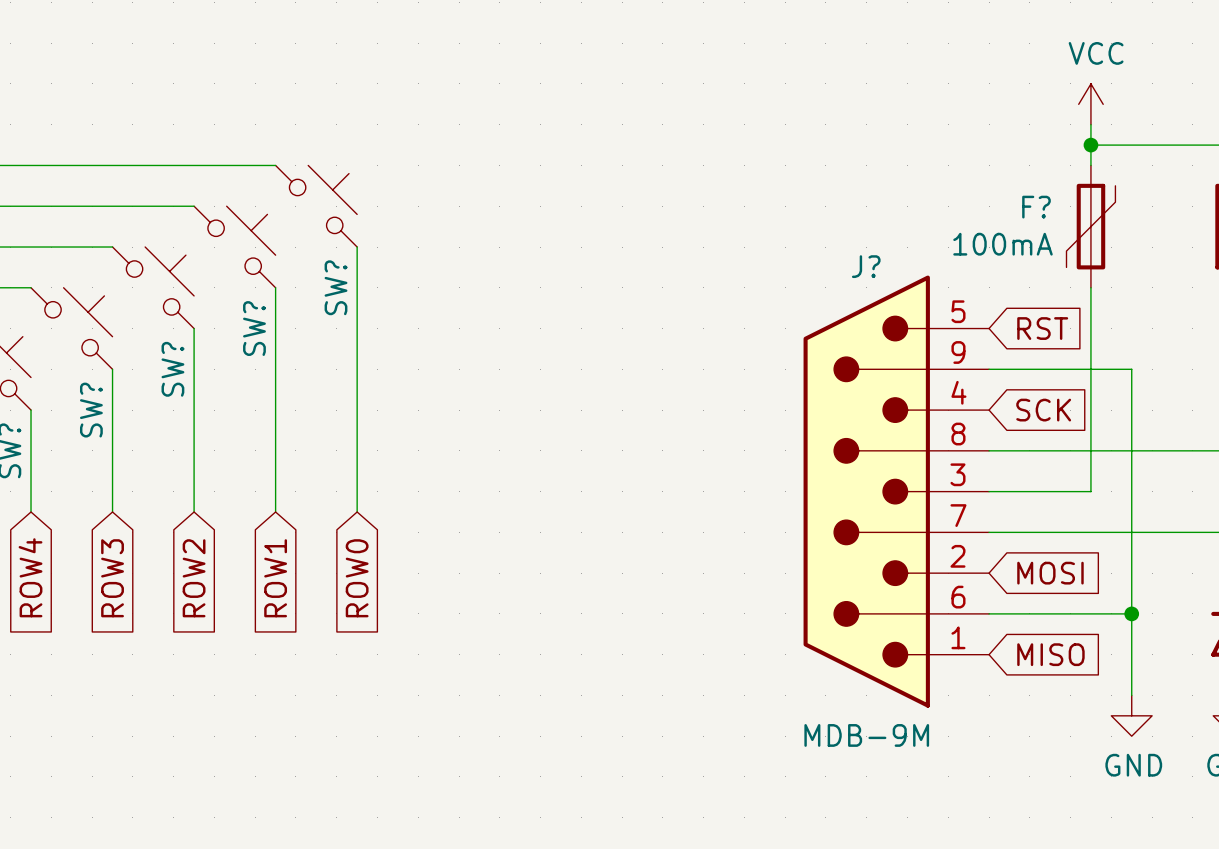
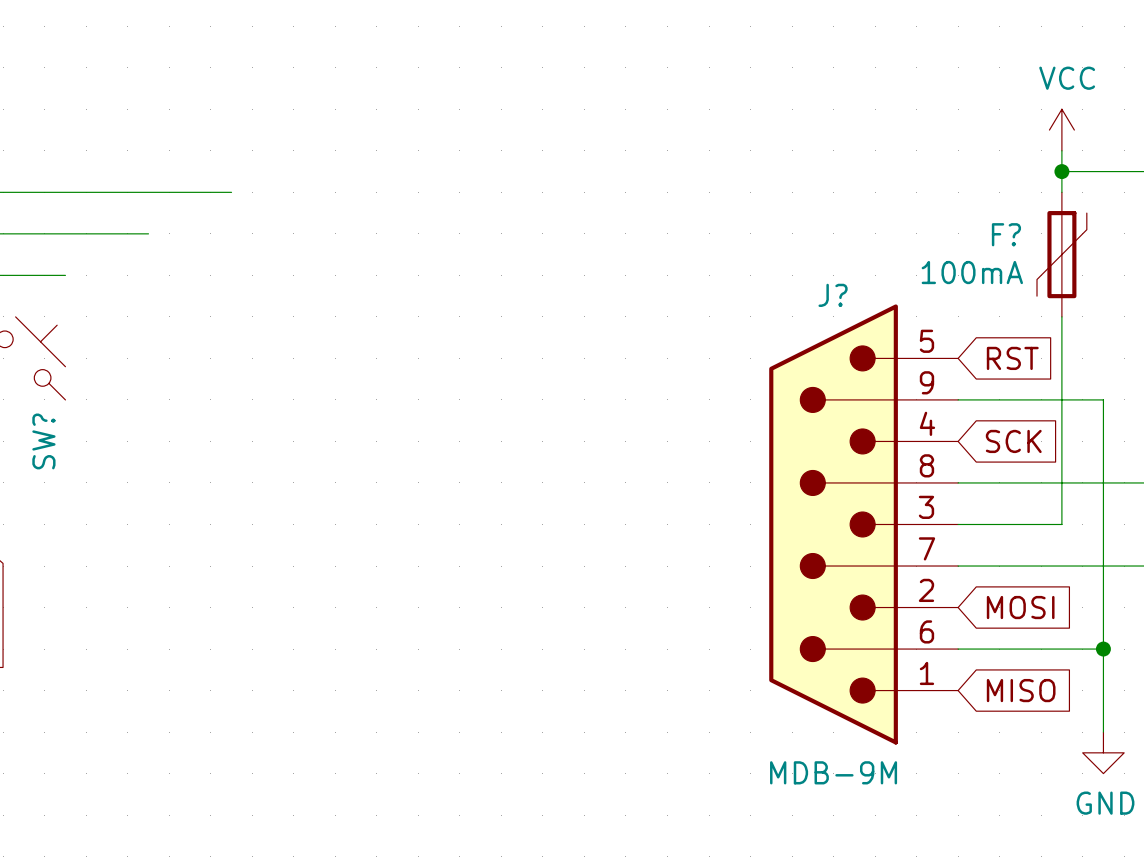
SW?: (316, 206) -> none
SW?: (234, 247) -> none
wire: (357, 247) (357, 511) -> none
SW?: (153, 287) -> none
wire: (275, 287) (275, 511) -> none
wire: (194, 328) (194, 511) -> none
wire: (112, 369) (112, 511) -> none
global label: ROW3 (112, 578) -> none
global label: ROW2 (194, 578) -> none
global label: ROW1 (275, 578) -> none
global label: ROW0 (357, 578) -> none

